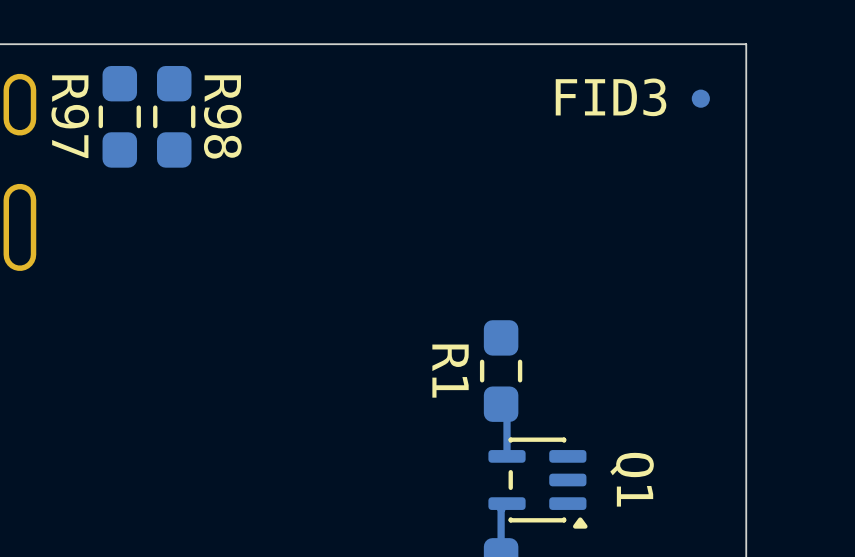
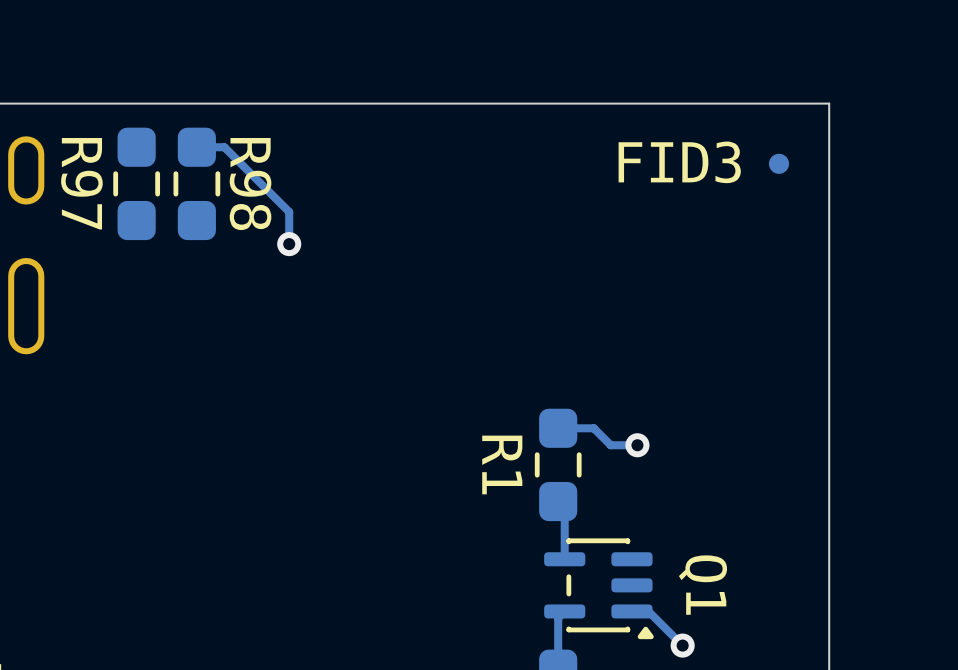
track: none -> (196, 147) (224, 147) (289, 211) (289, 244)
via: none -> (289, 244)
track: none -> (558, 428) (593, 428) (610, 445) (637, 445)
via: none -> (637, 445)
track: none -> (631, 611) (648, 611) (682, 645)
via: none -> (682, 645)

